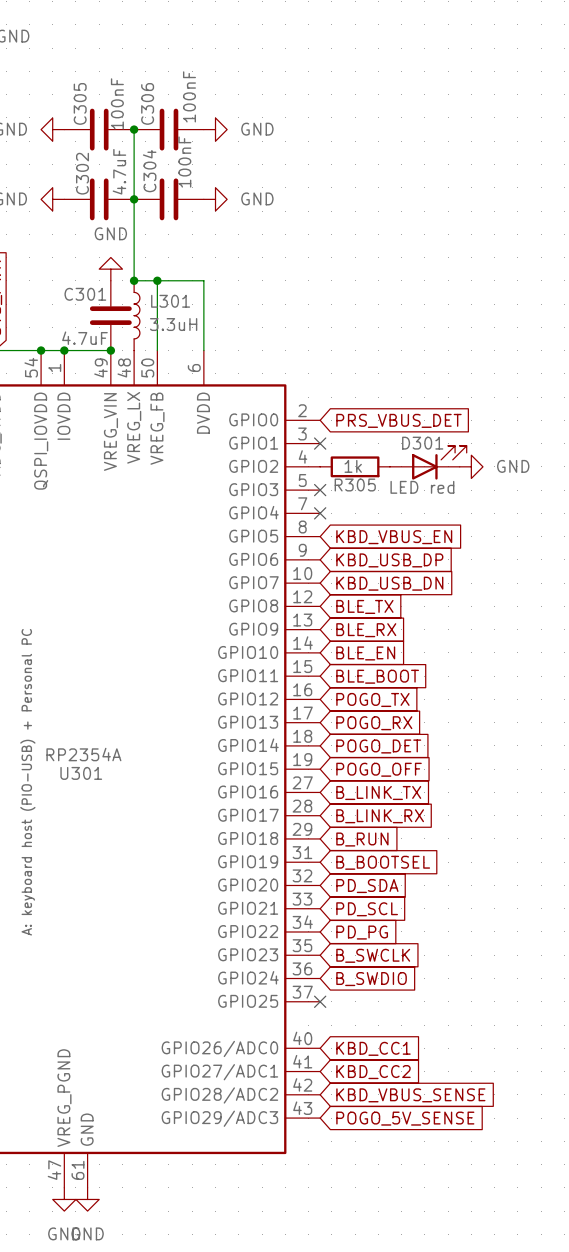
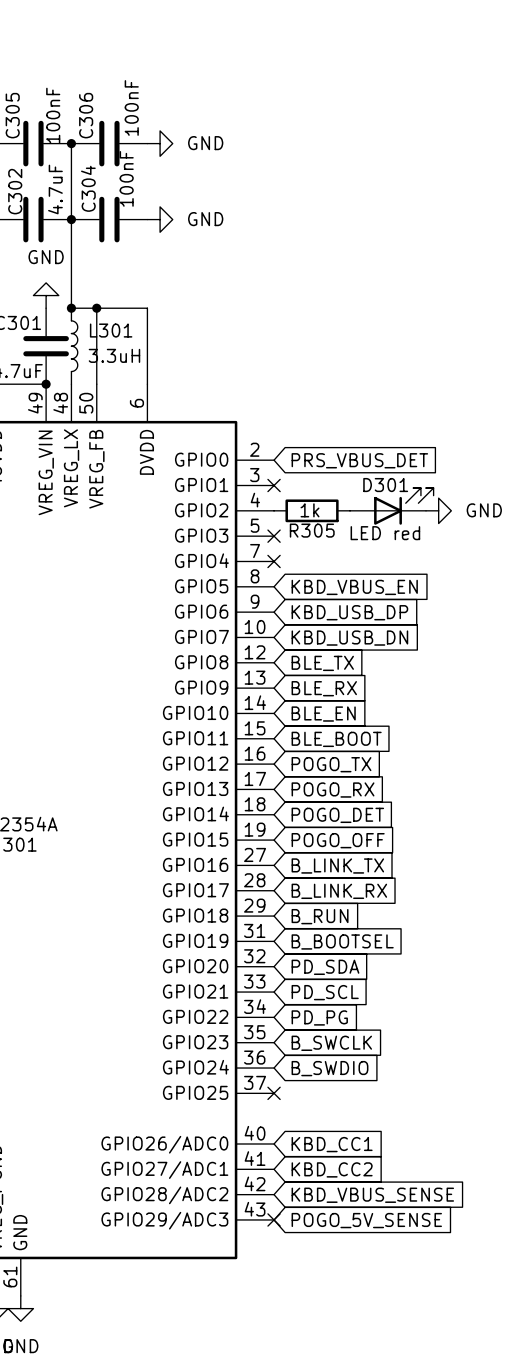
no-connect mark: none -> (274, 1219)

